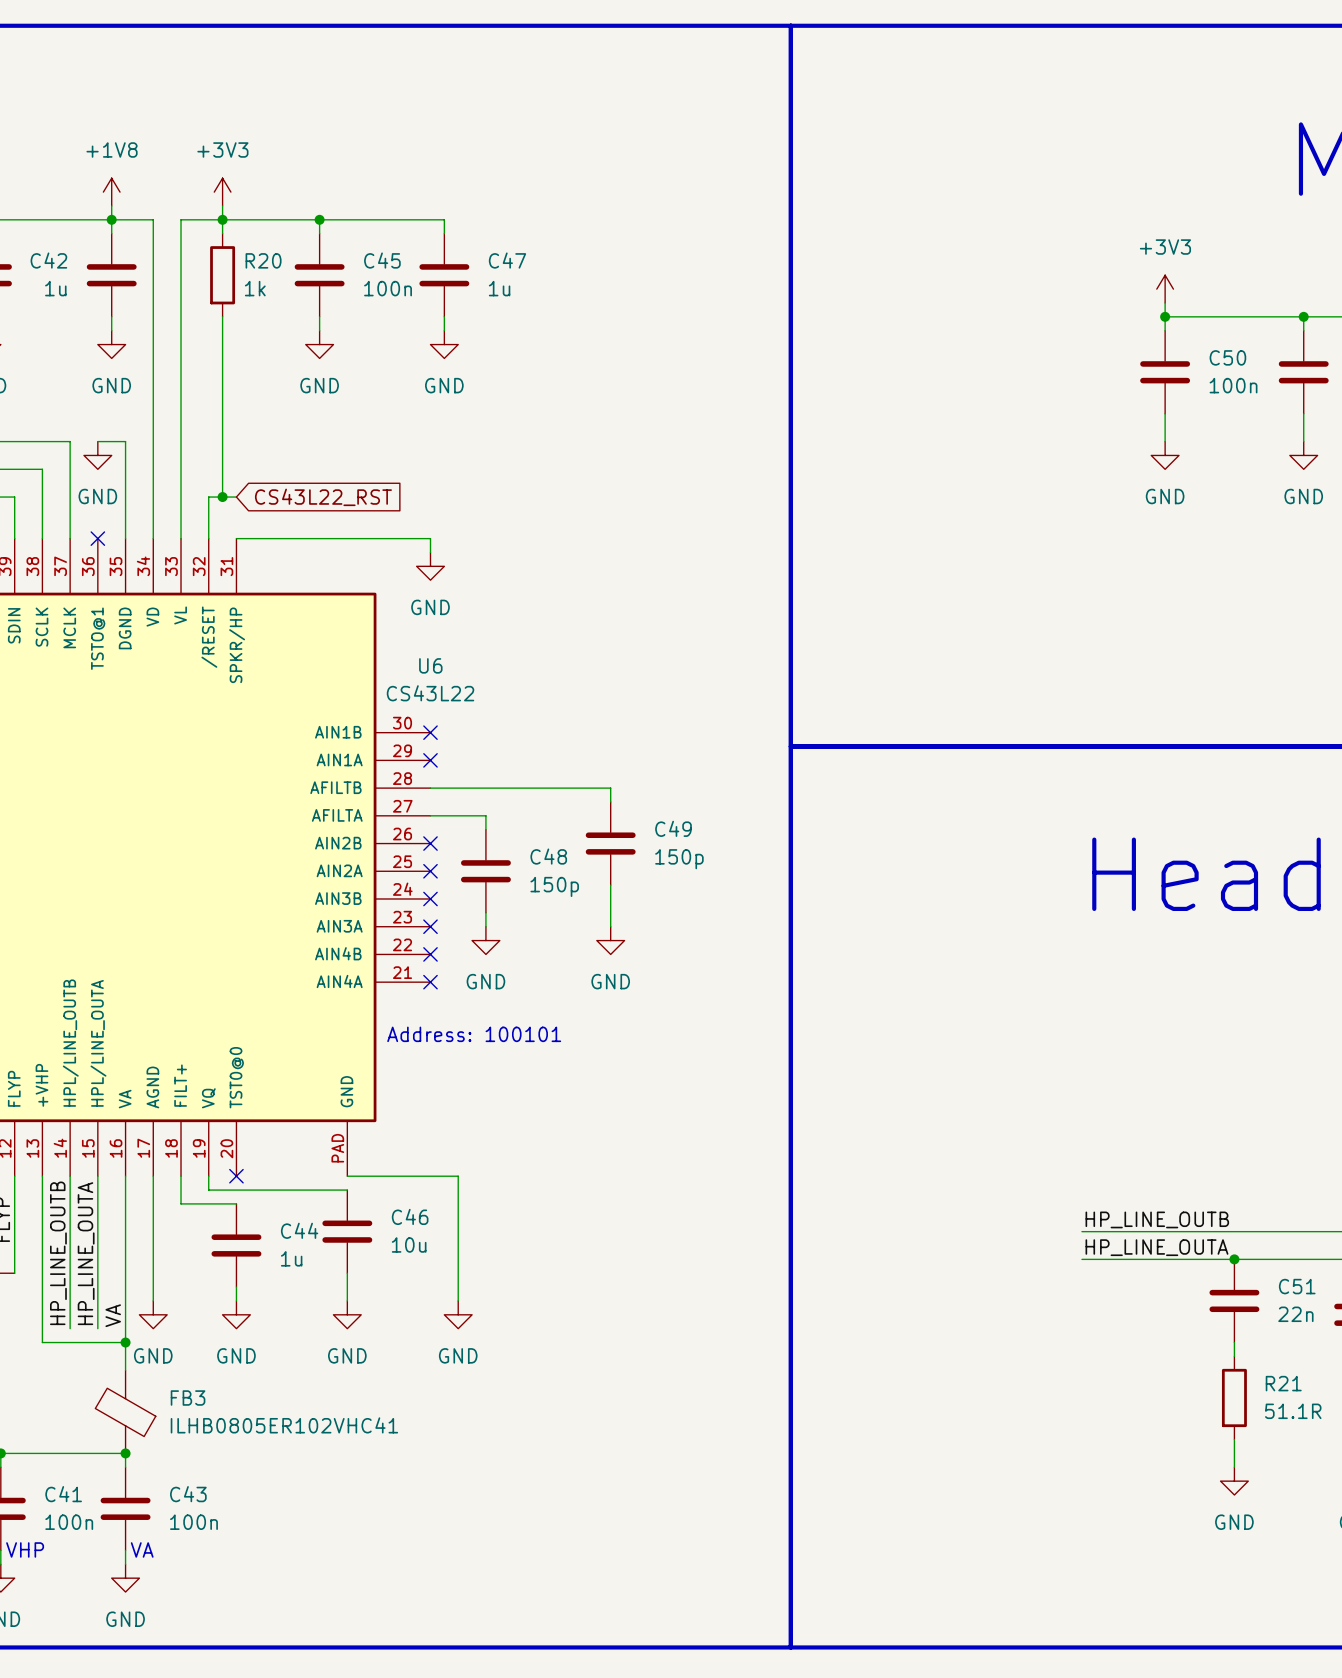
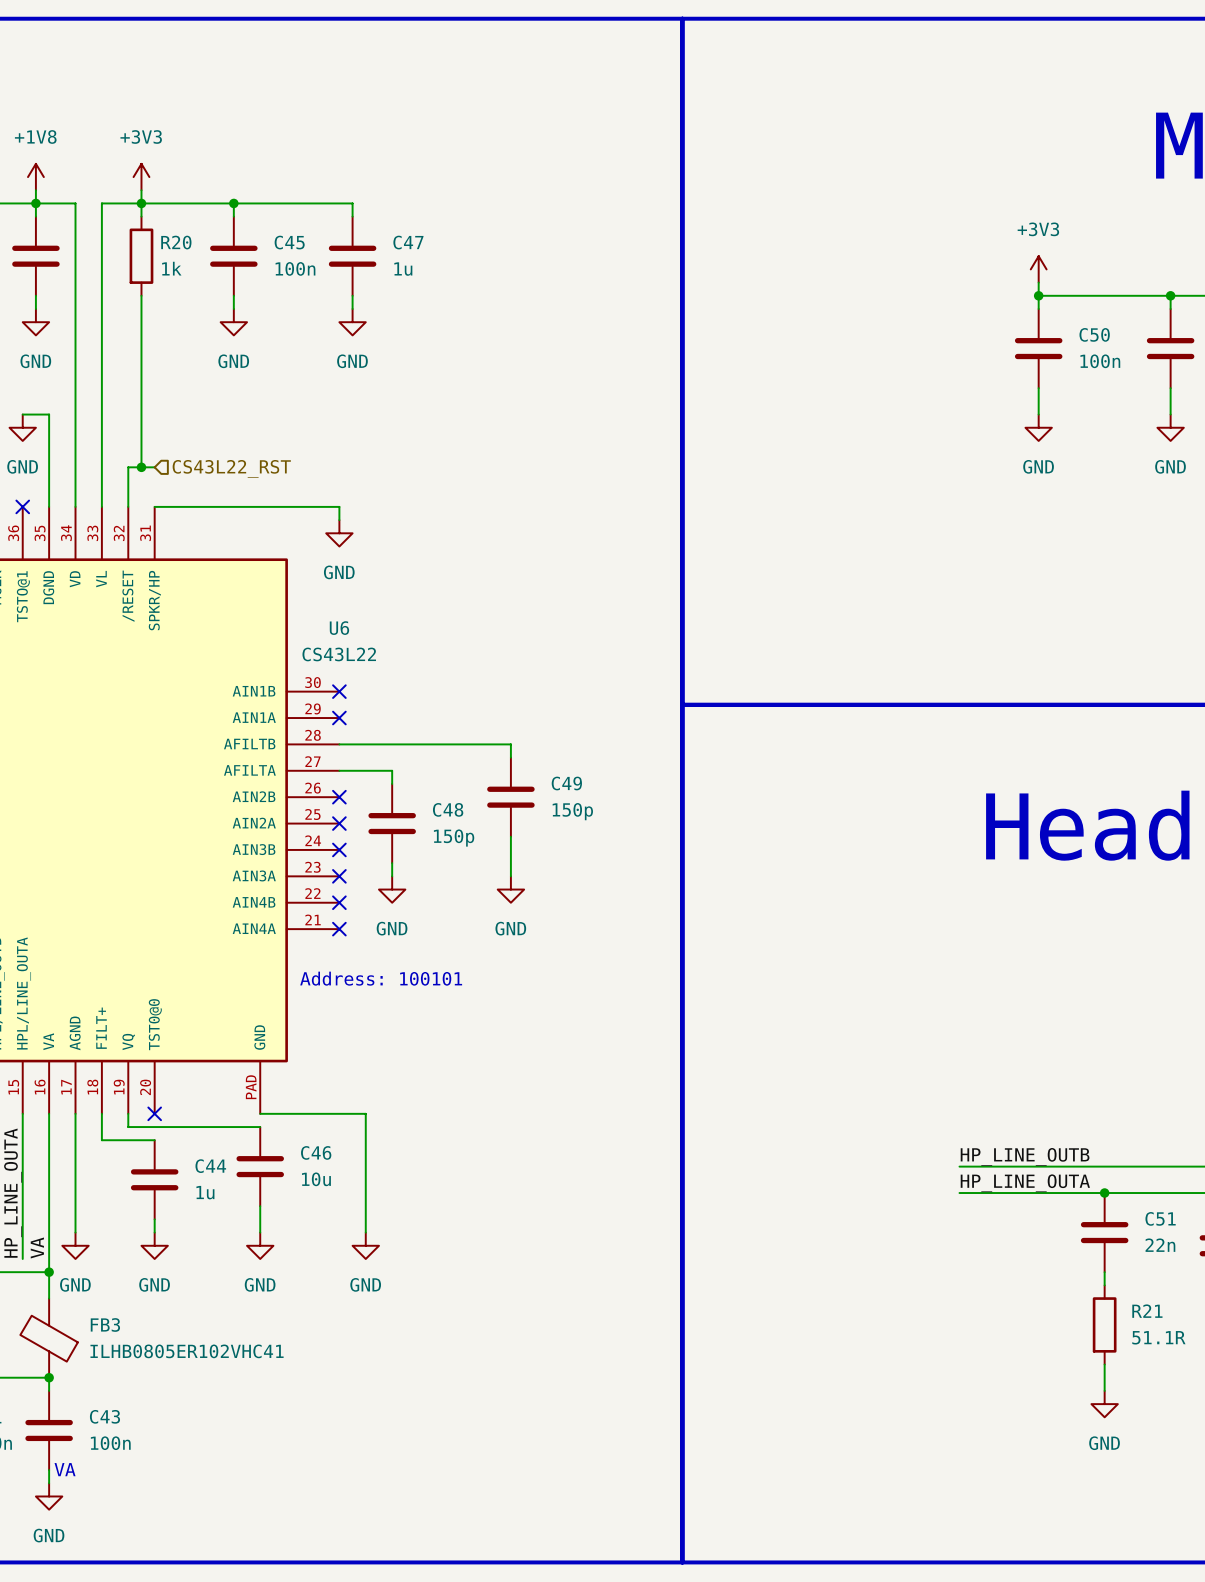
hierarchical label: none -> CS43L22_RST (231, 468)
global label: CS43L22_RST (323, 497) -> none

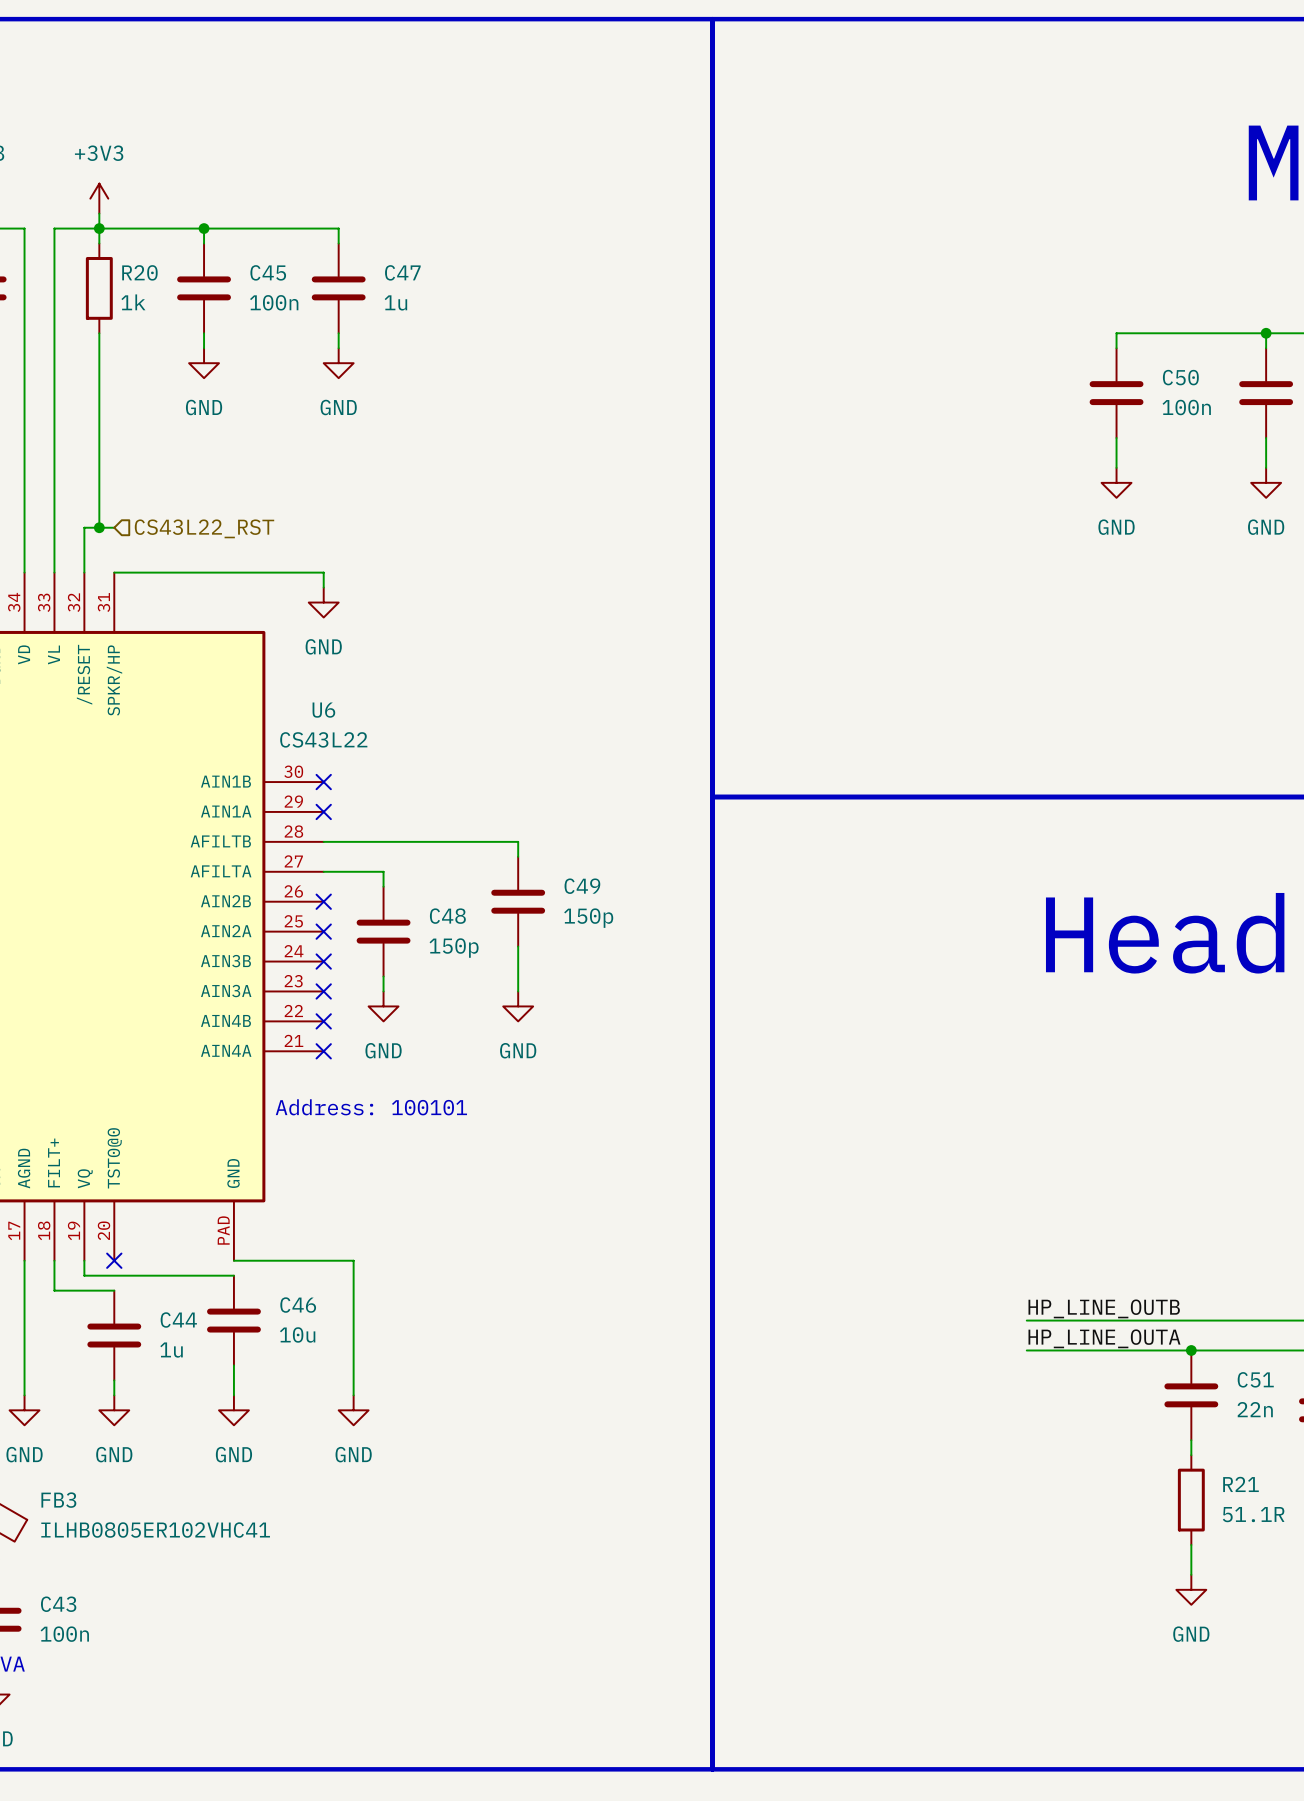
power symbol: +3V3 (1038, 269) -> none
wire: (1038, 282) (1038, 295) -> none
junction: (1038, 295) -> none

